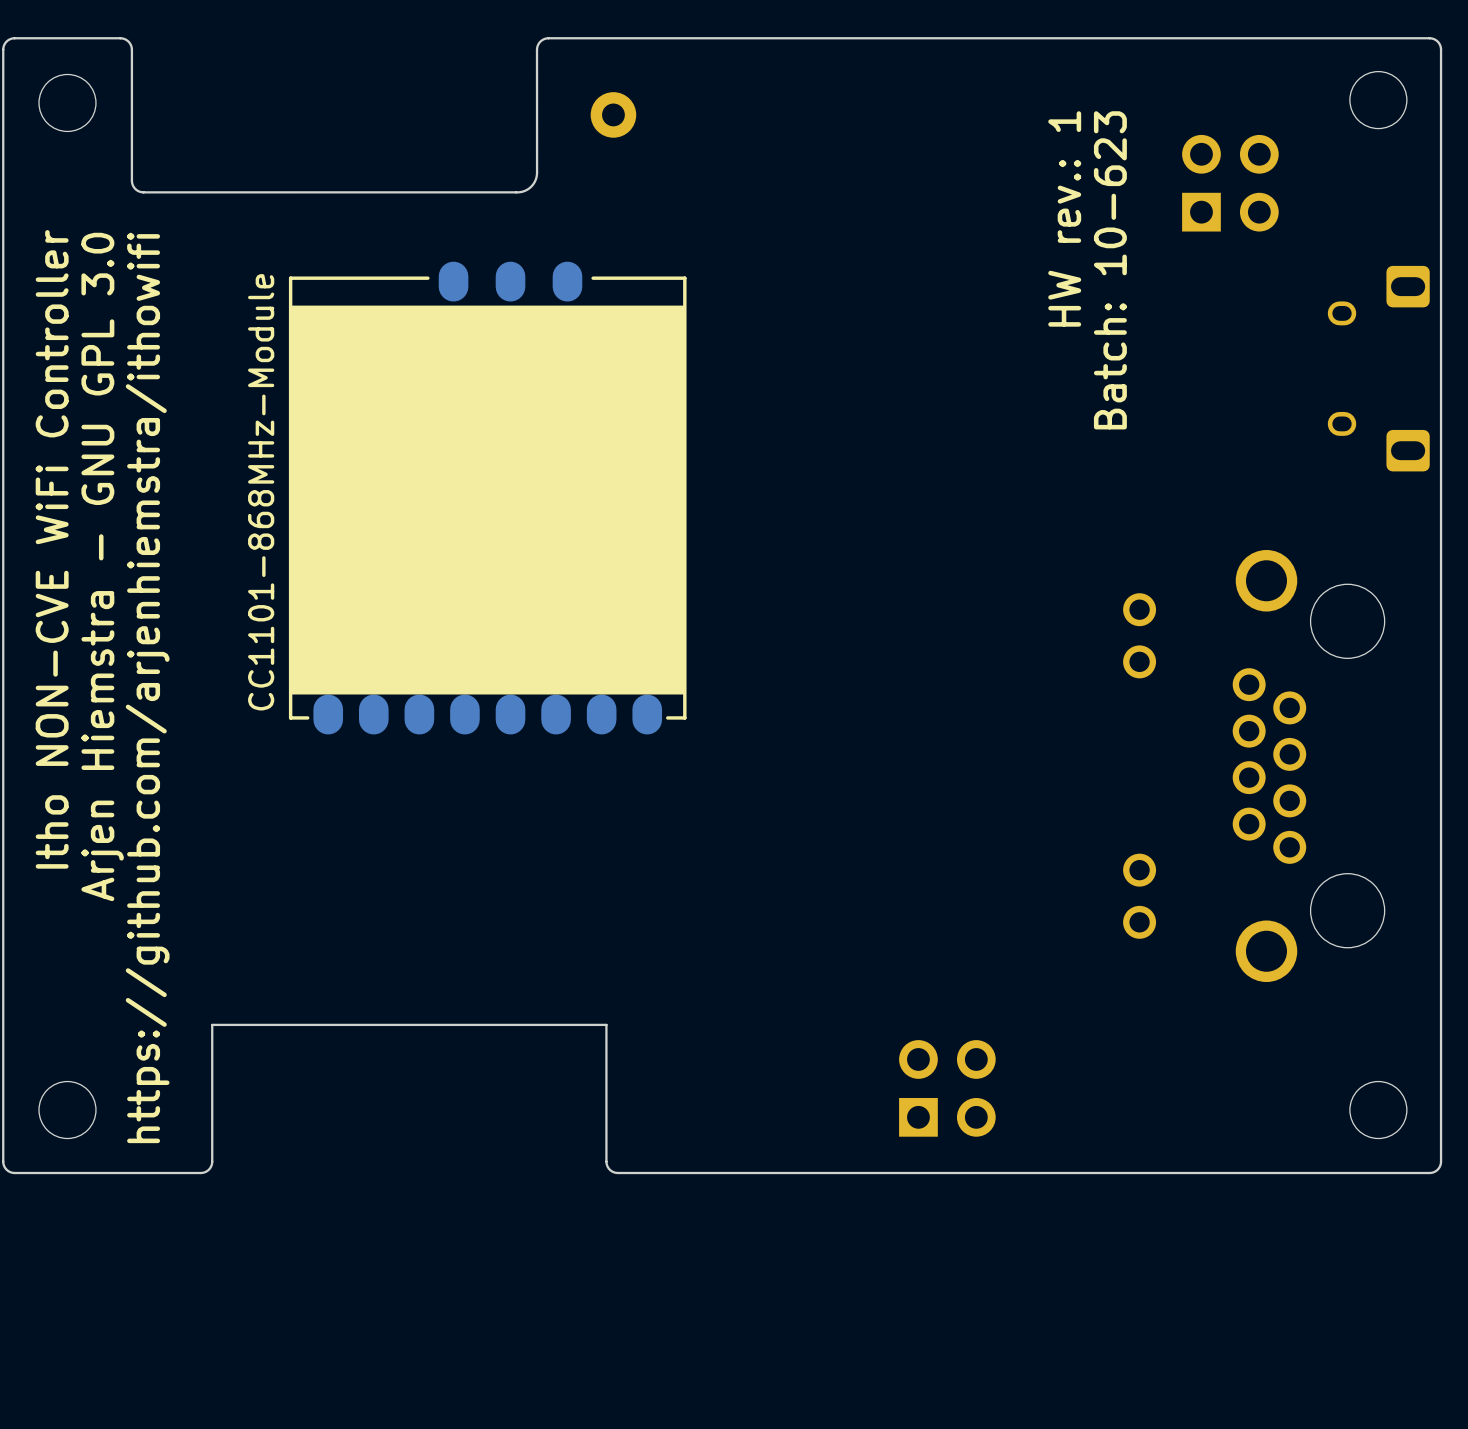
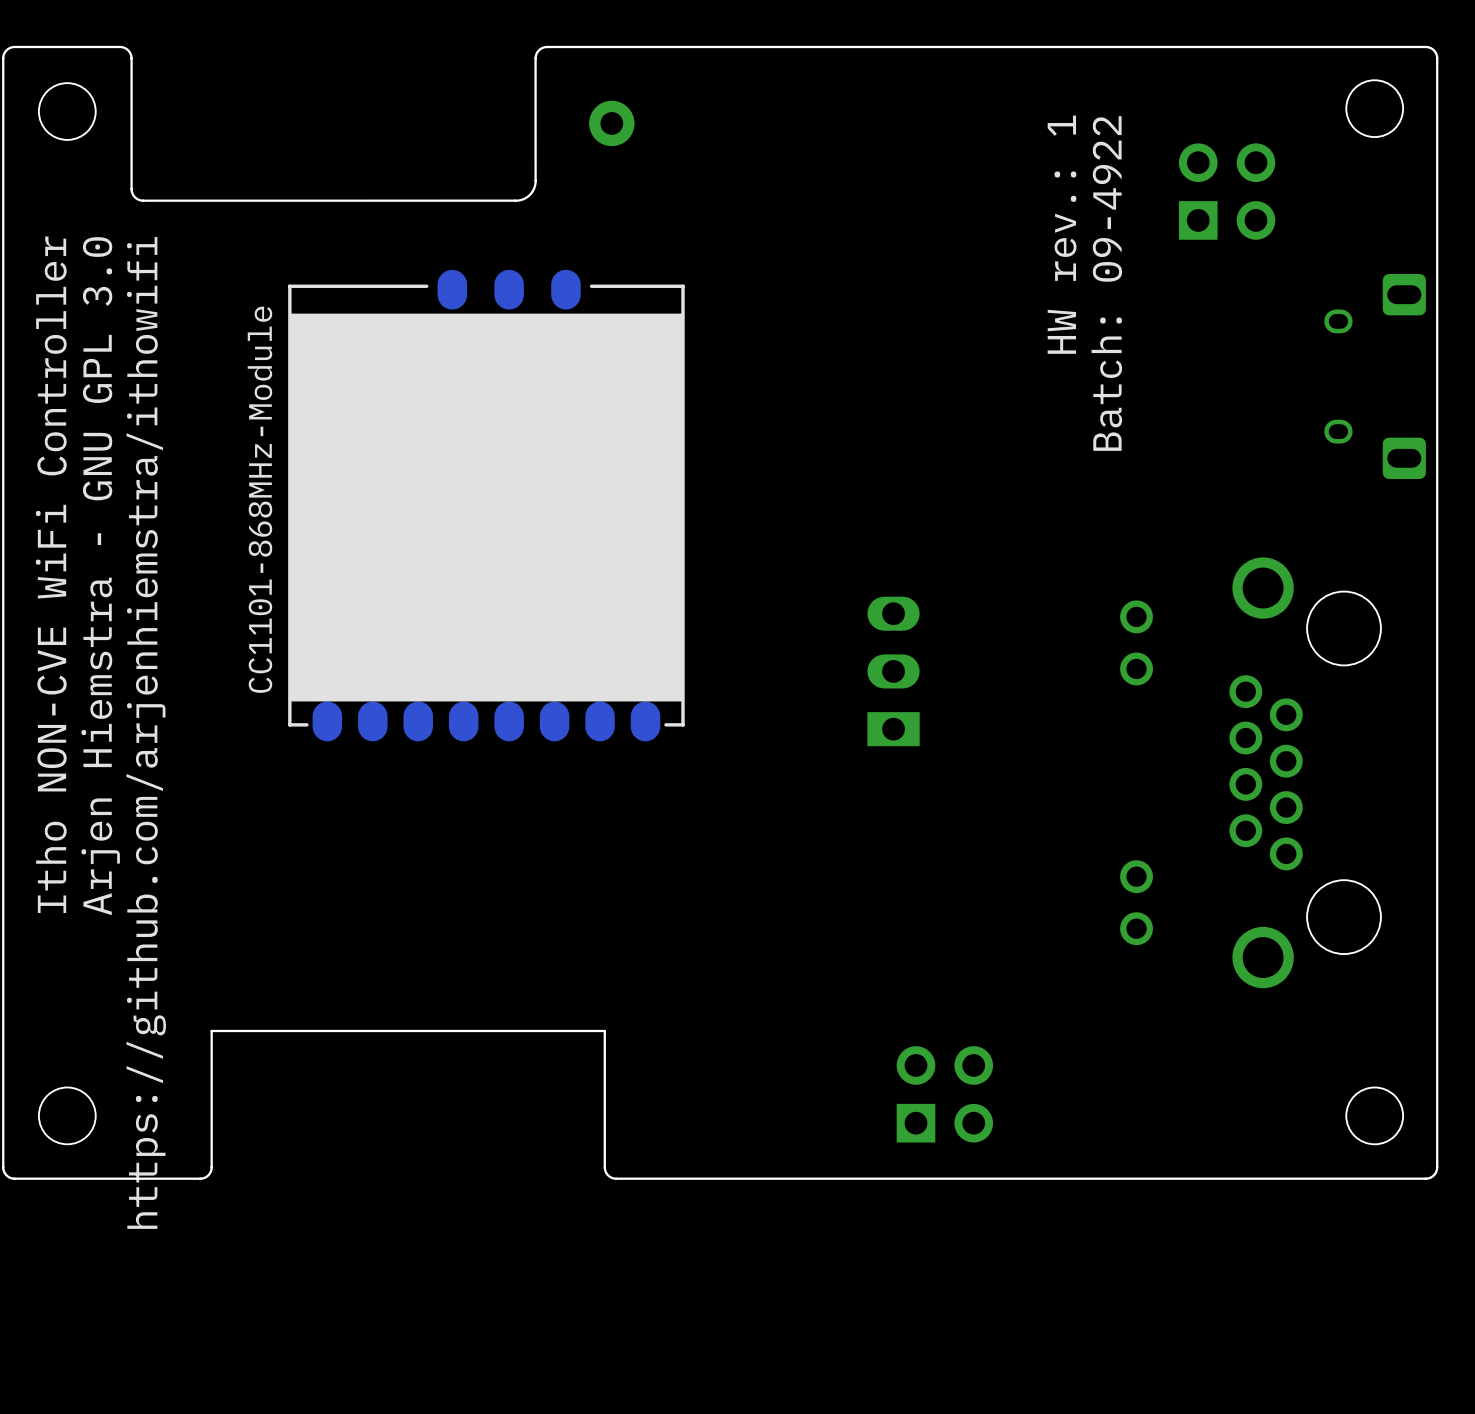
text: Batch: 10-623 (1110, 270) -> Batch: 09-4922 (1106, 283)
part: none -> (893, 671)

